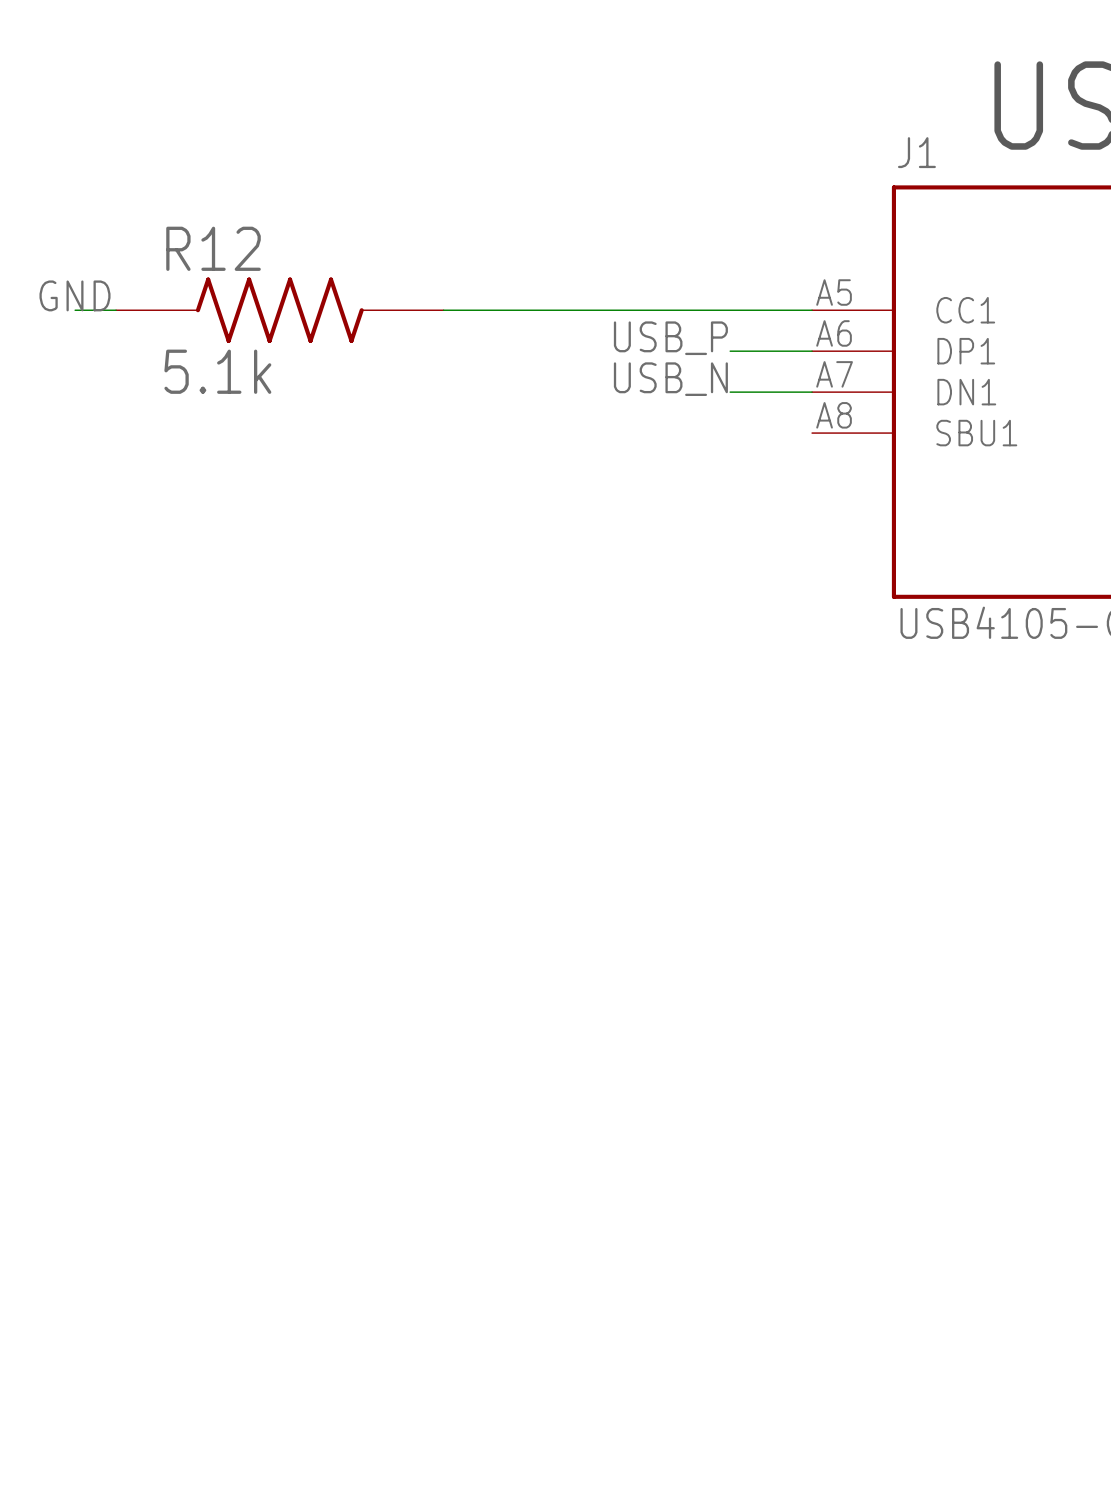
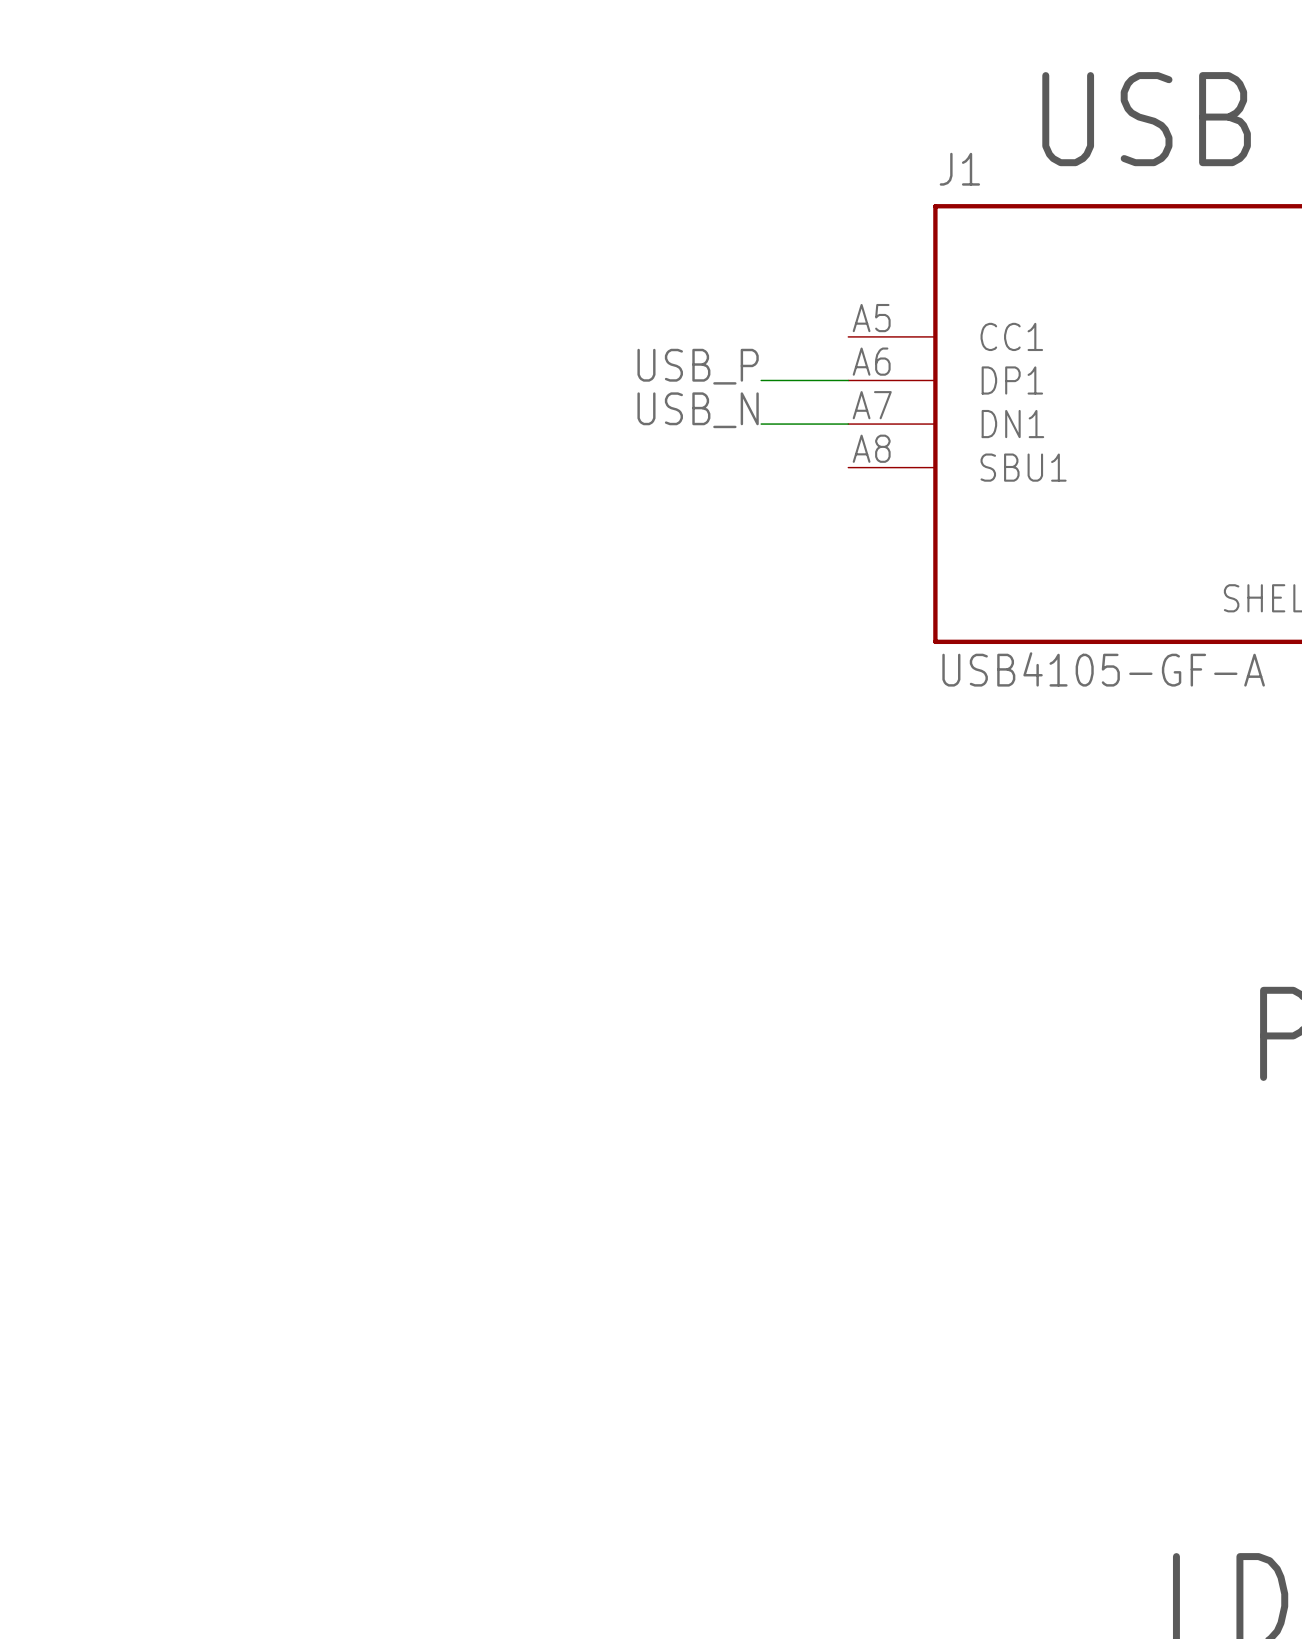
label: GND (75, 295) -> none
wire: (75, 310) (116, 310) -> none
R12: 5.1k (279, 310) -> none
wire: (443, 310) (812, 310) -> none

